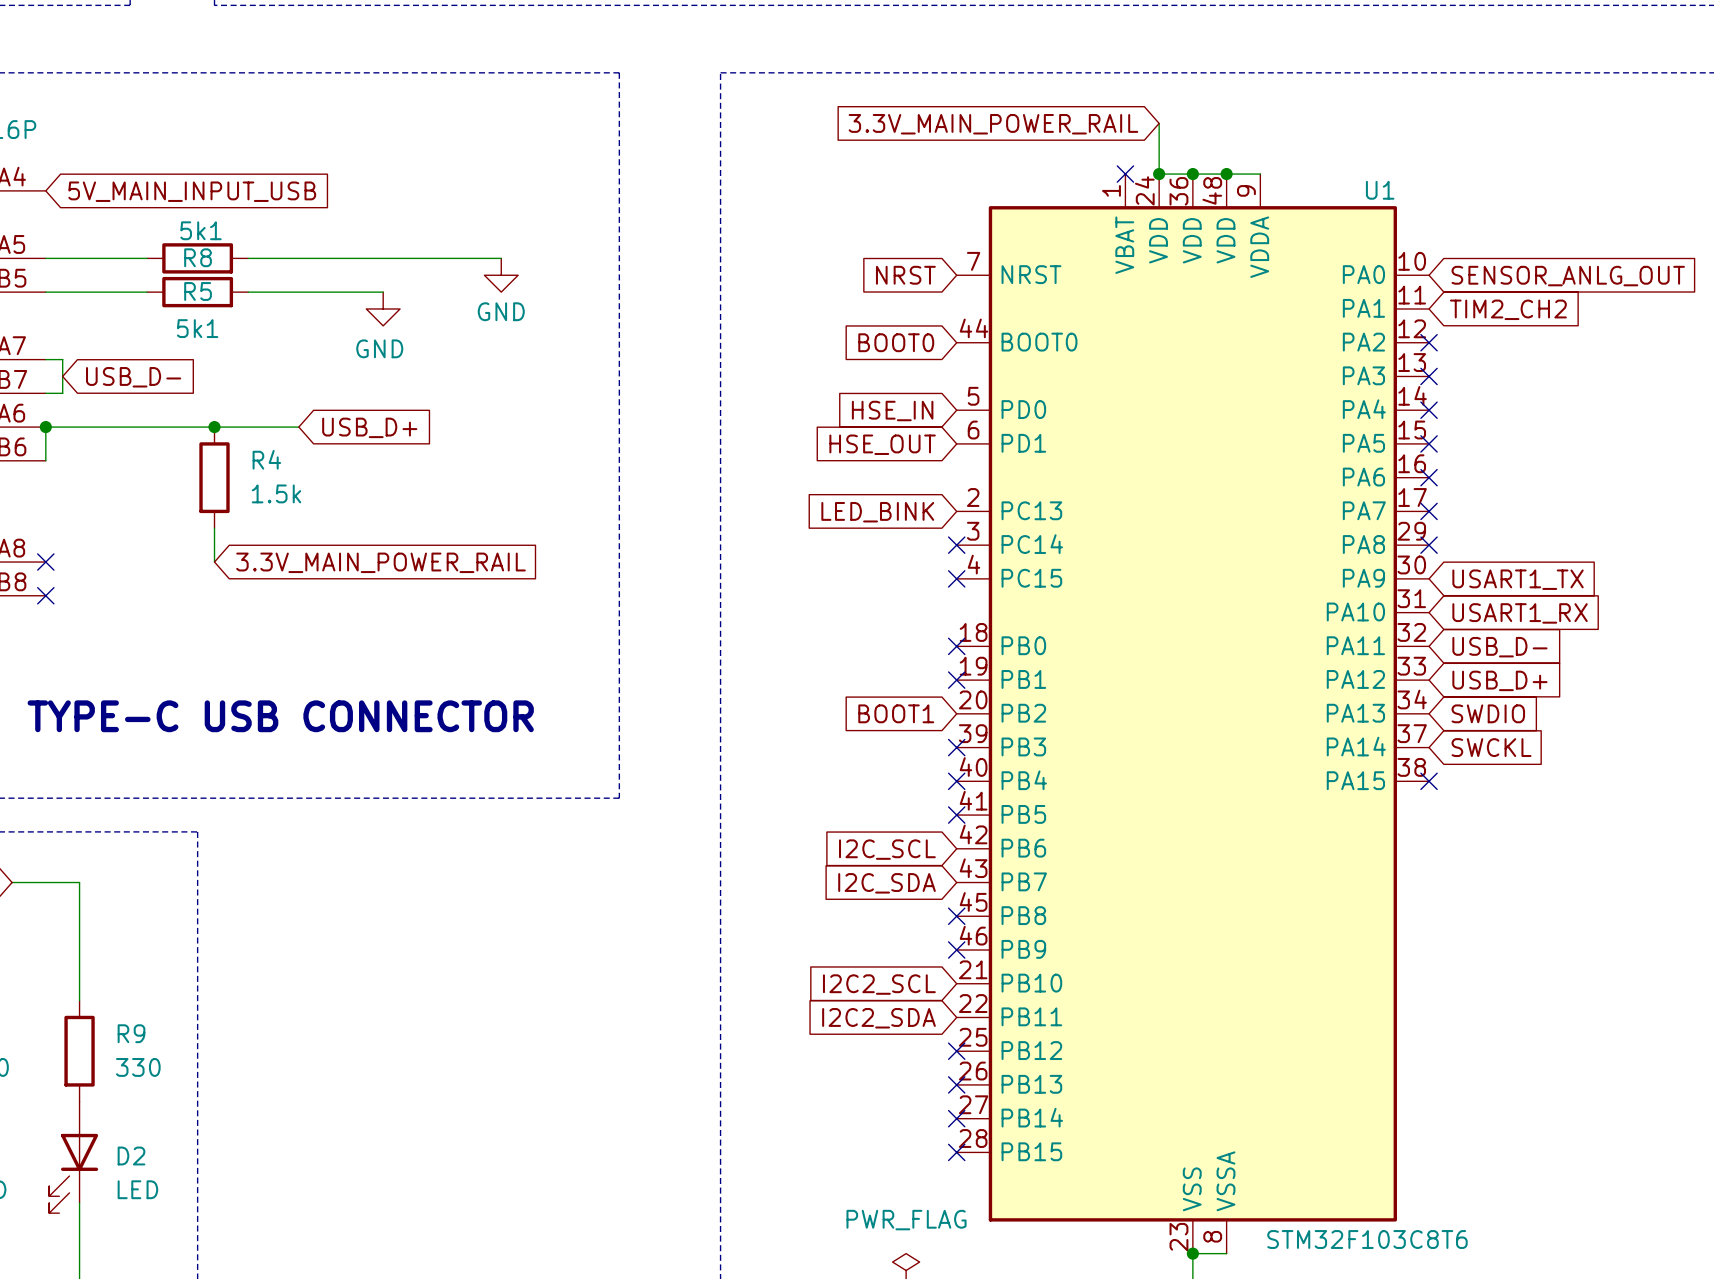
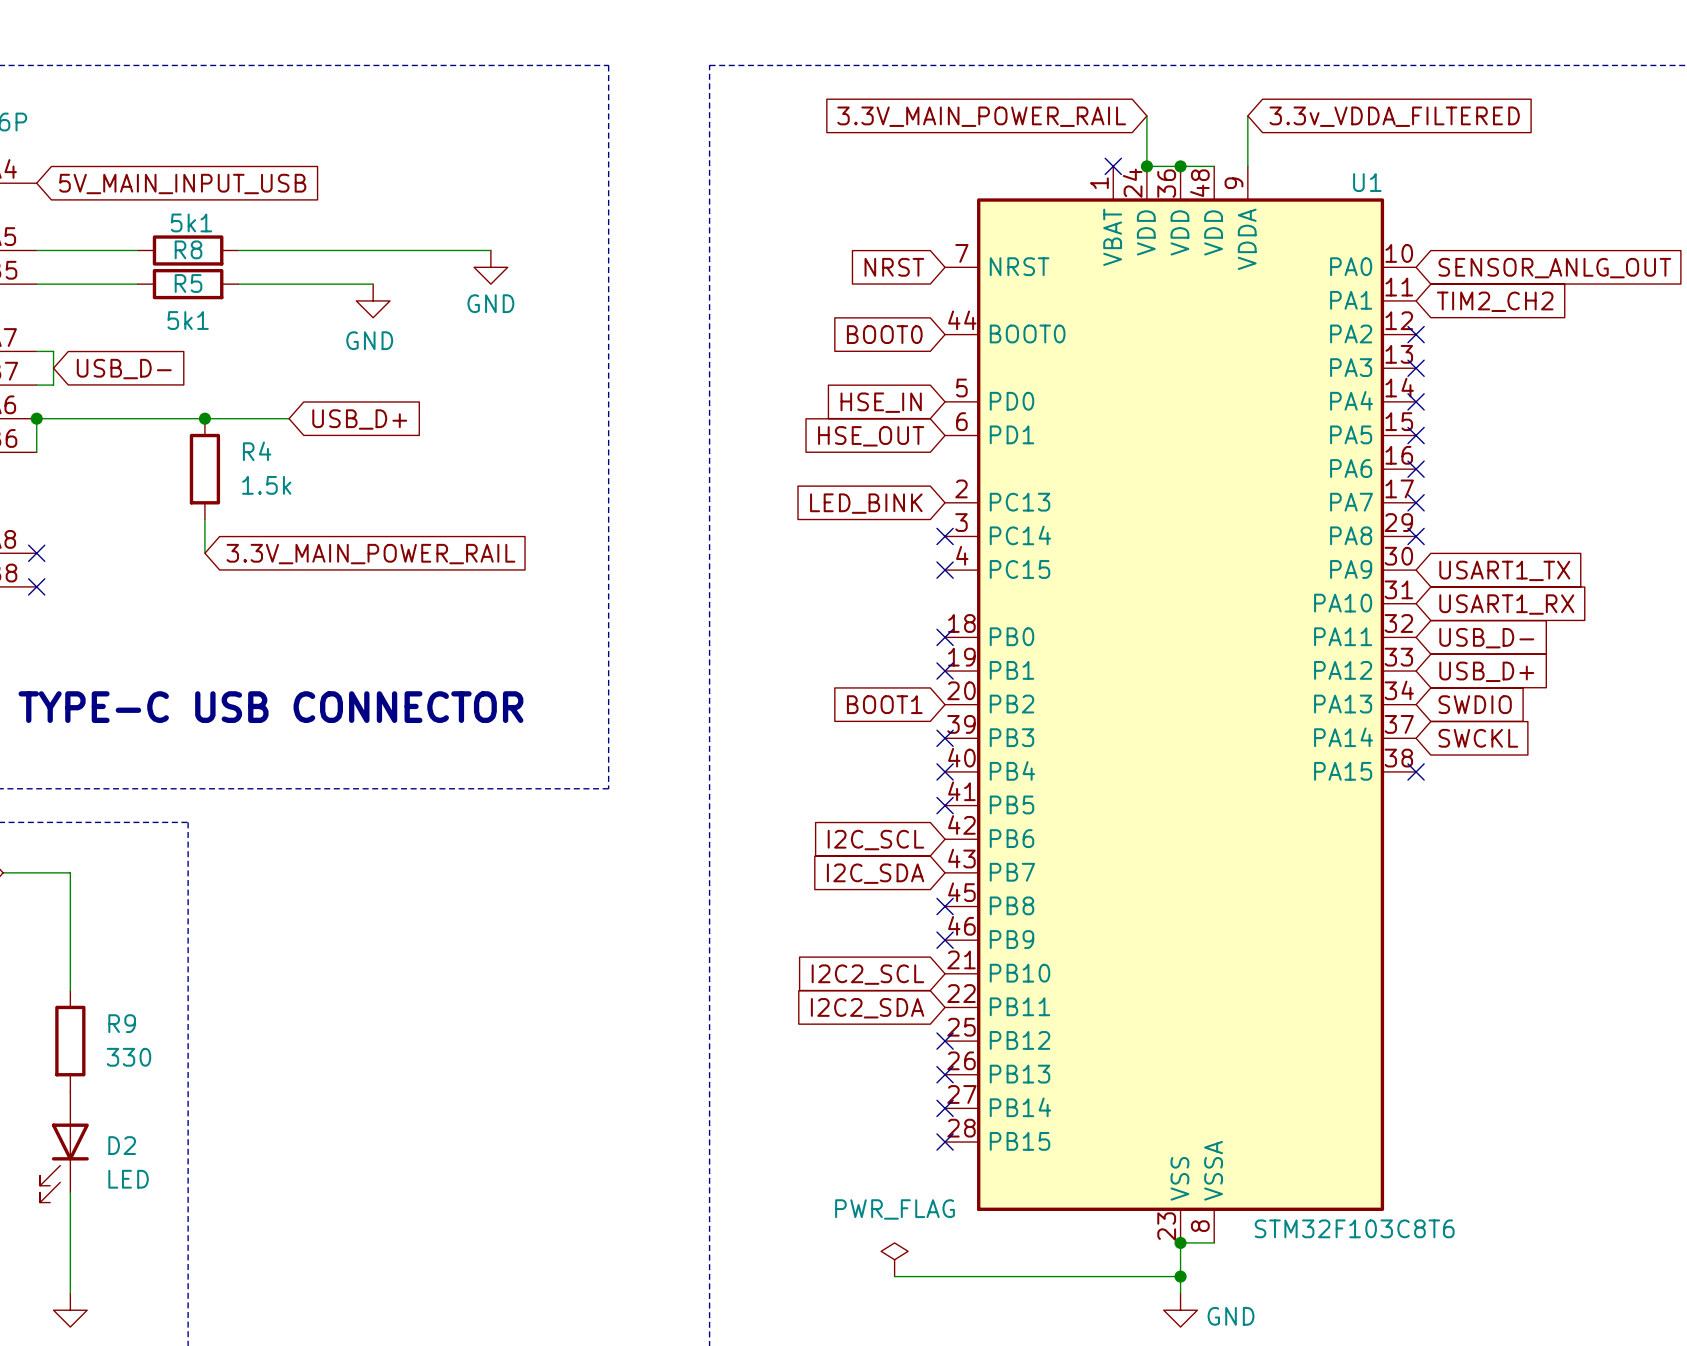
global label: none -> 3.3v_VDDA_FILTERED (1394, 116)
wire: (1226, 174) (1260, 174) -> (1247, 115) (1247, 166)
junction: (1226, 174) -> none

